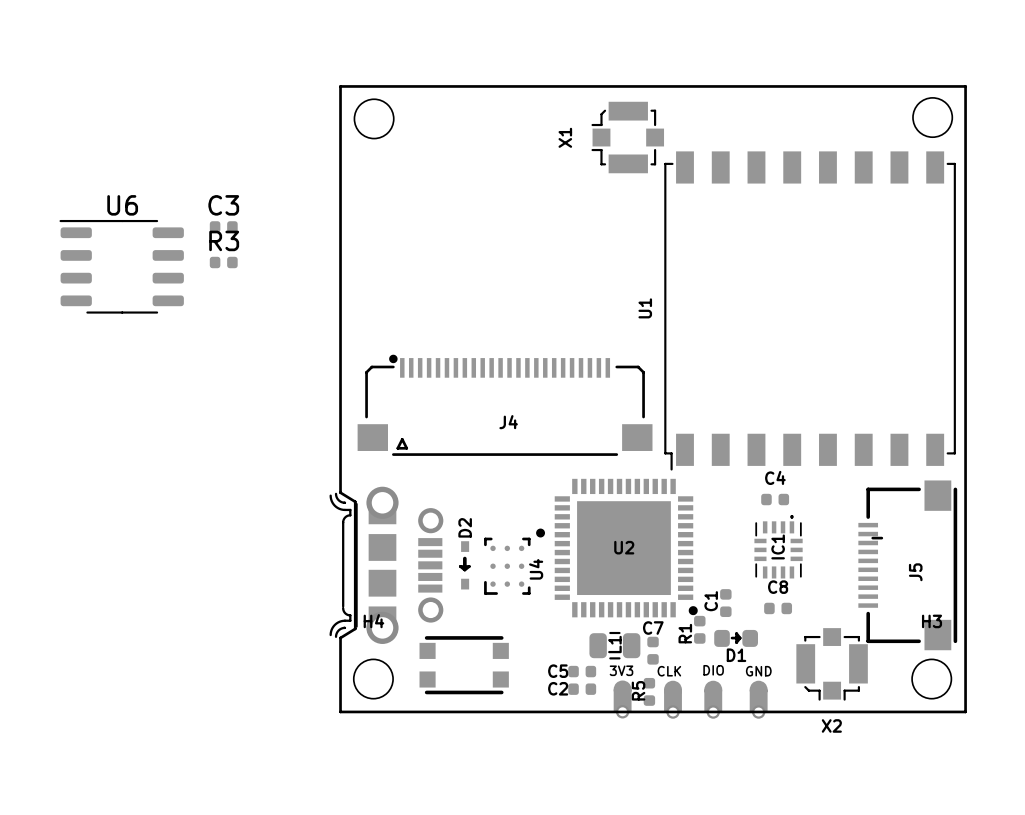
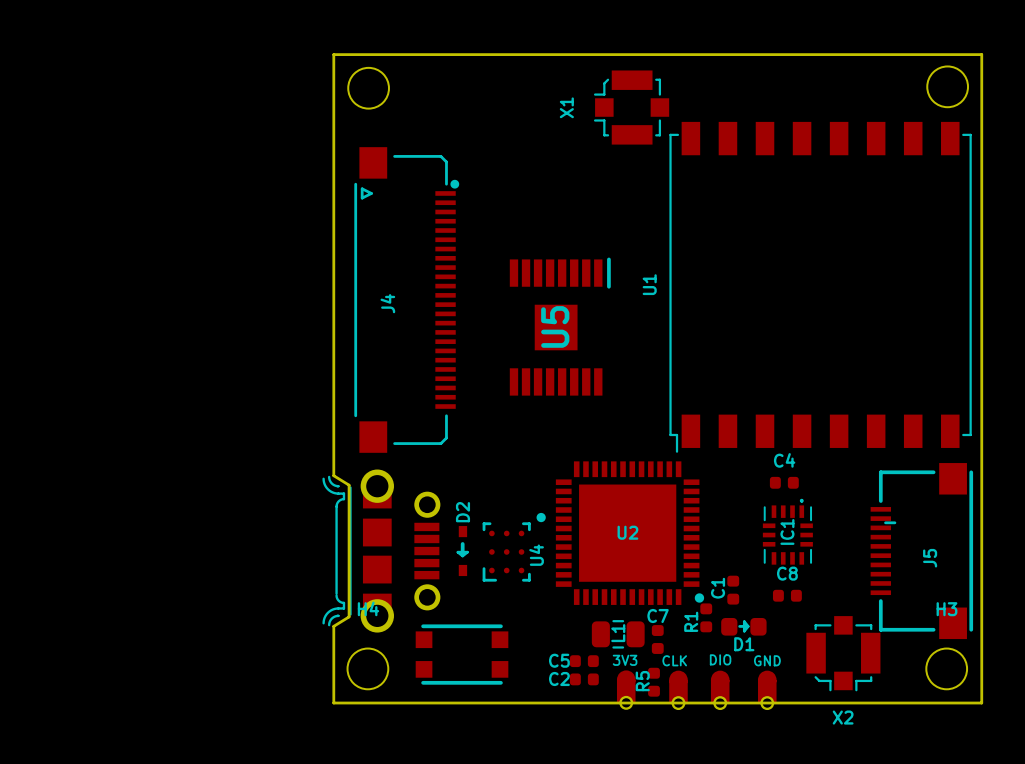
C3: (223, 226) -> none
R3: (223, 262) -> none
U6: (121, 266) -> none
U5: none -> (560, 326)
J4 rotation: 0° (505, 405) -> 90° clockwise (406, 299)

